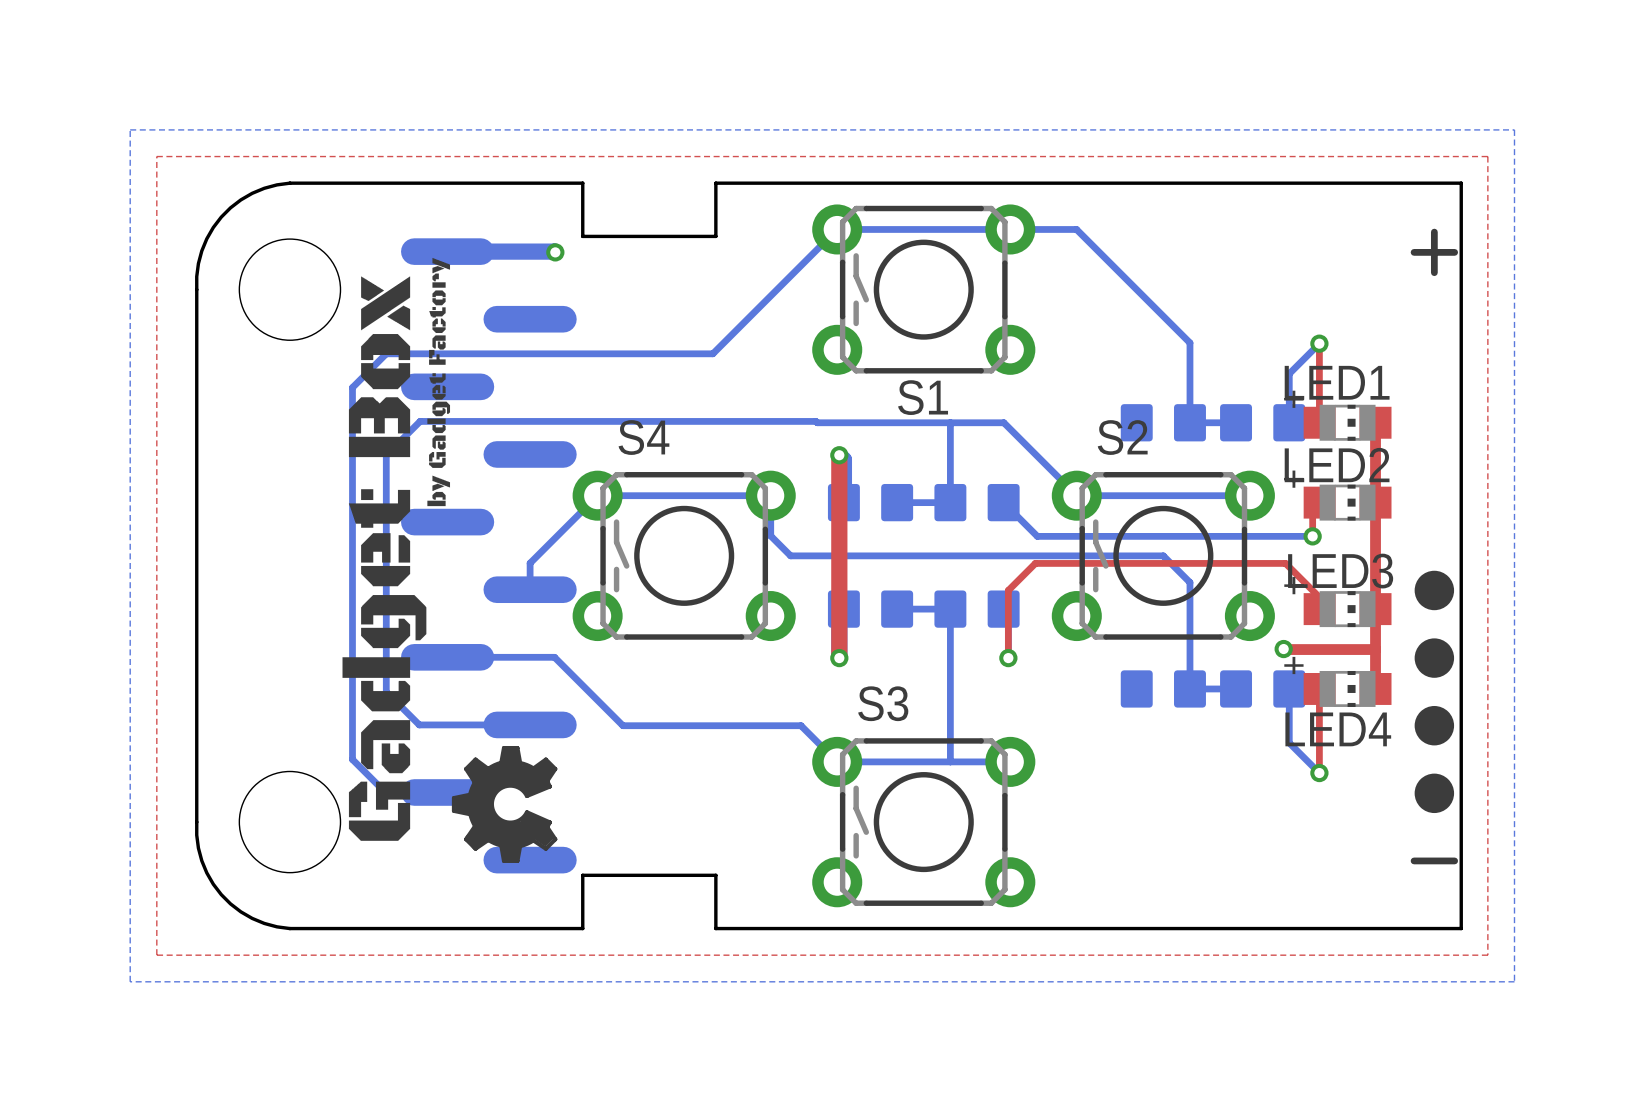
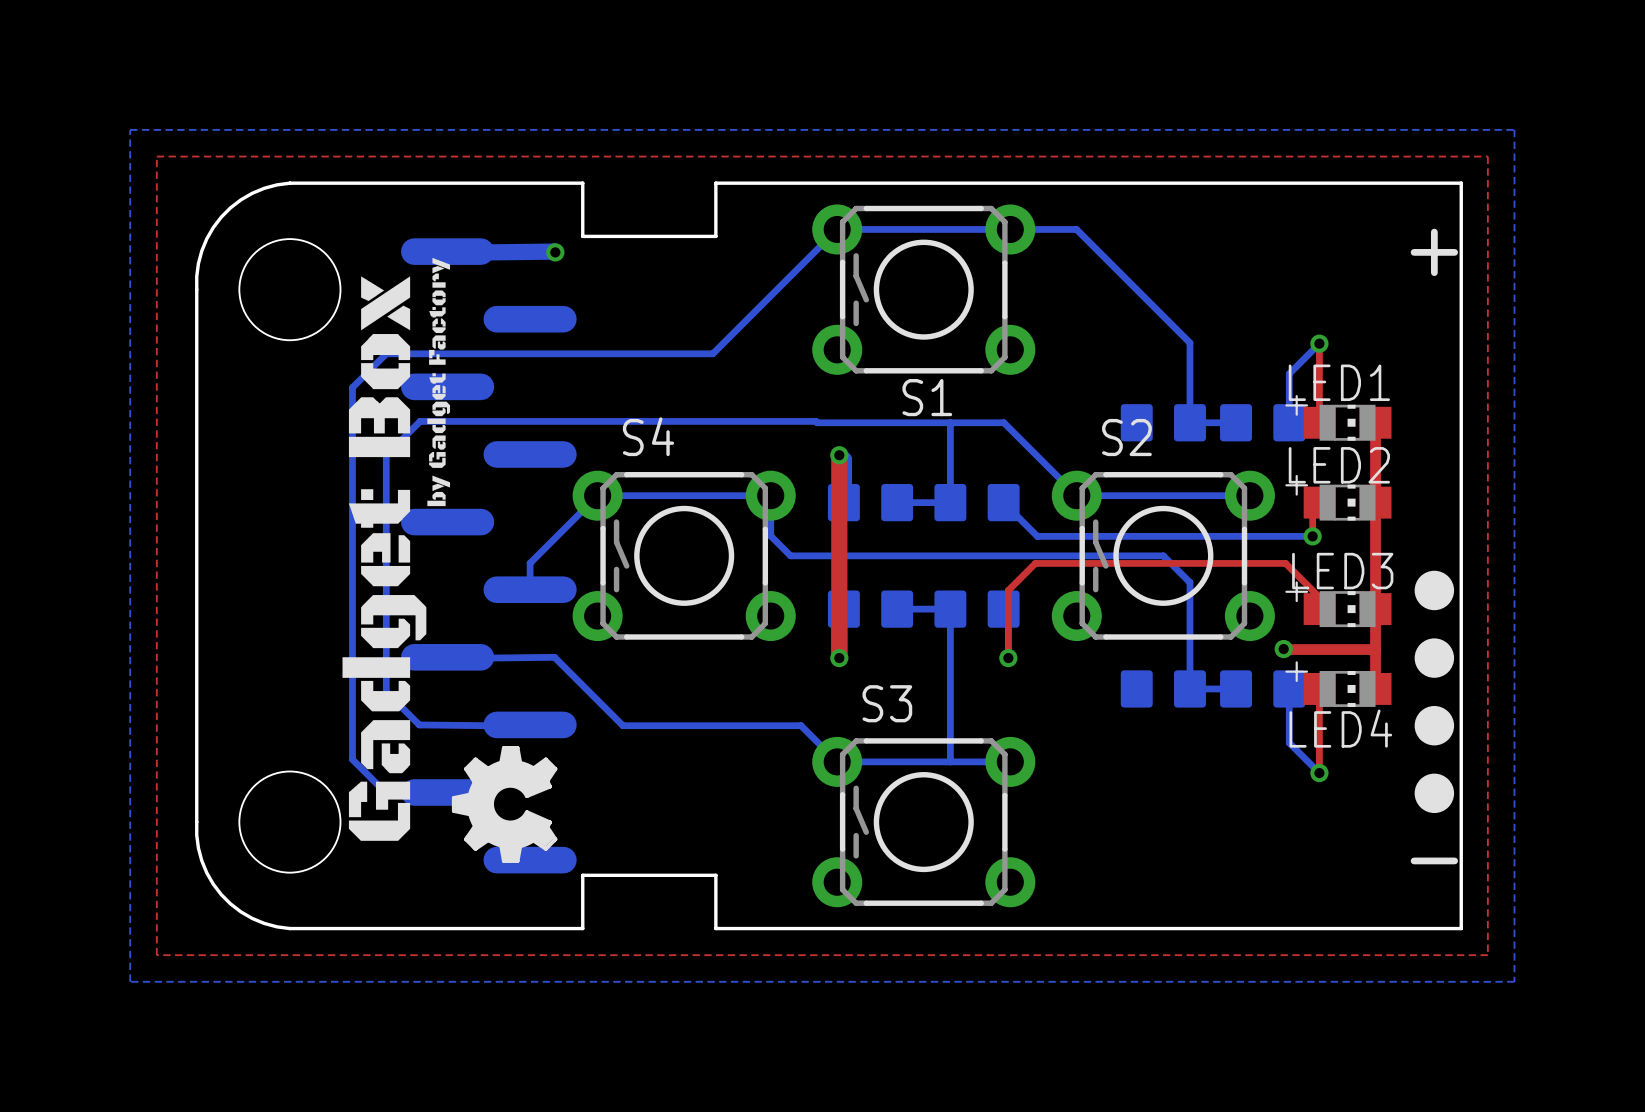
bottom track: (447, 251) (554, 251) -> (487, 252) (554, 251)
bottom track: (447, 657) (554, 657) -> (487, 658) (554, 657)
bottom track: (419, 724) (530, 724) -> (419, 724) (487, 725)

